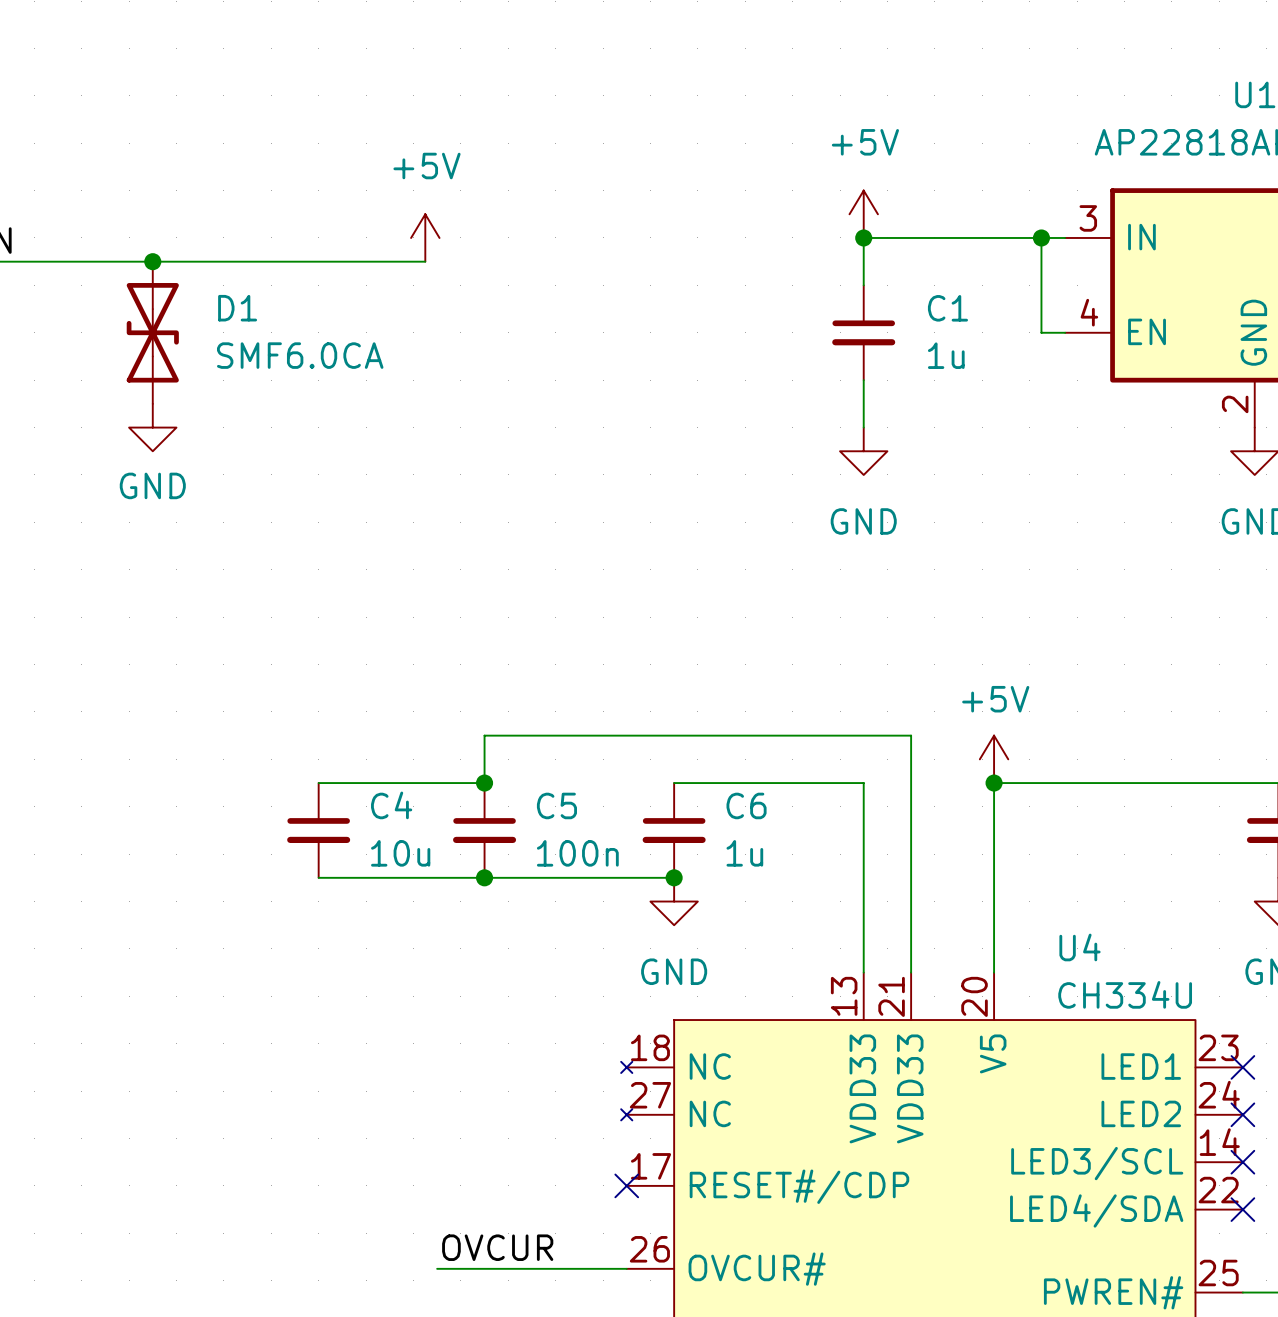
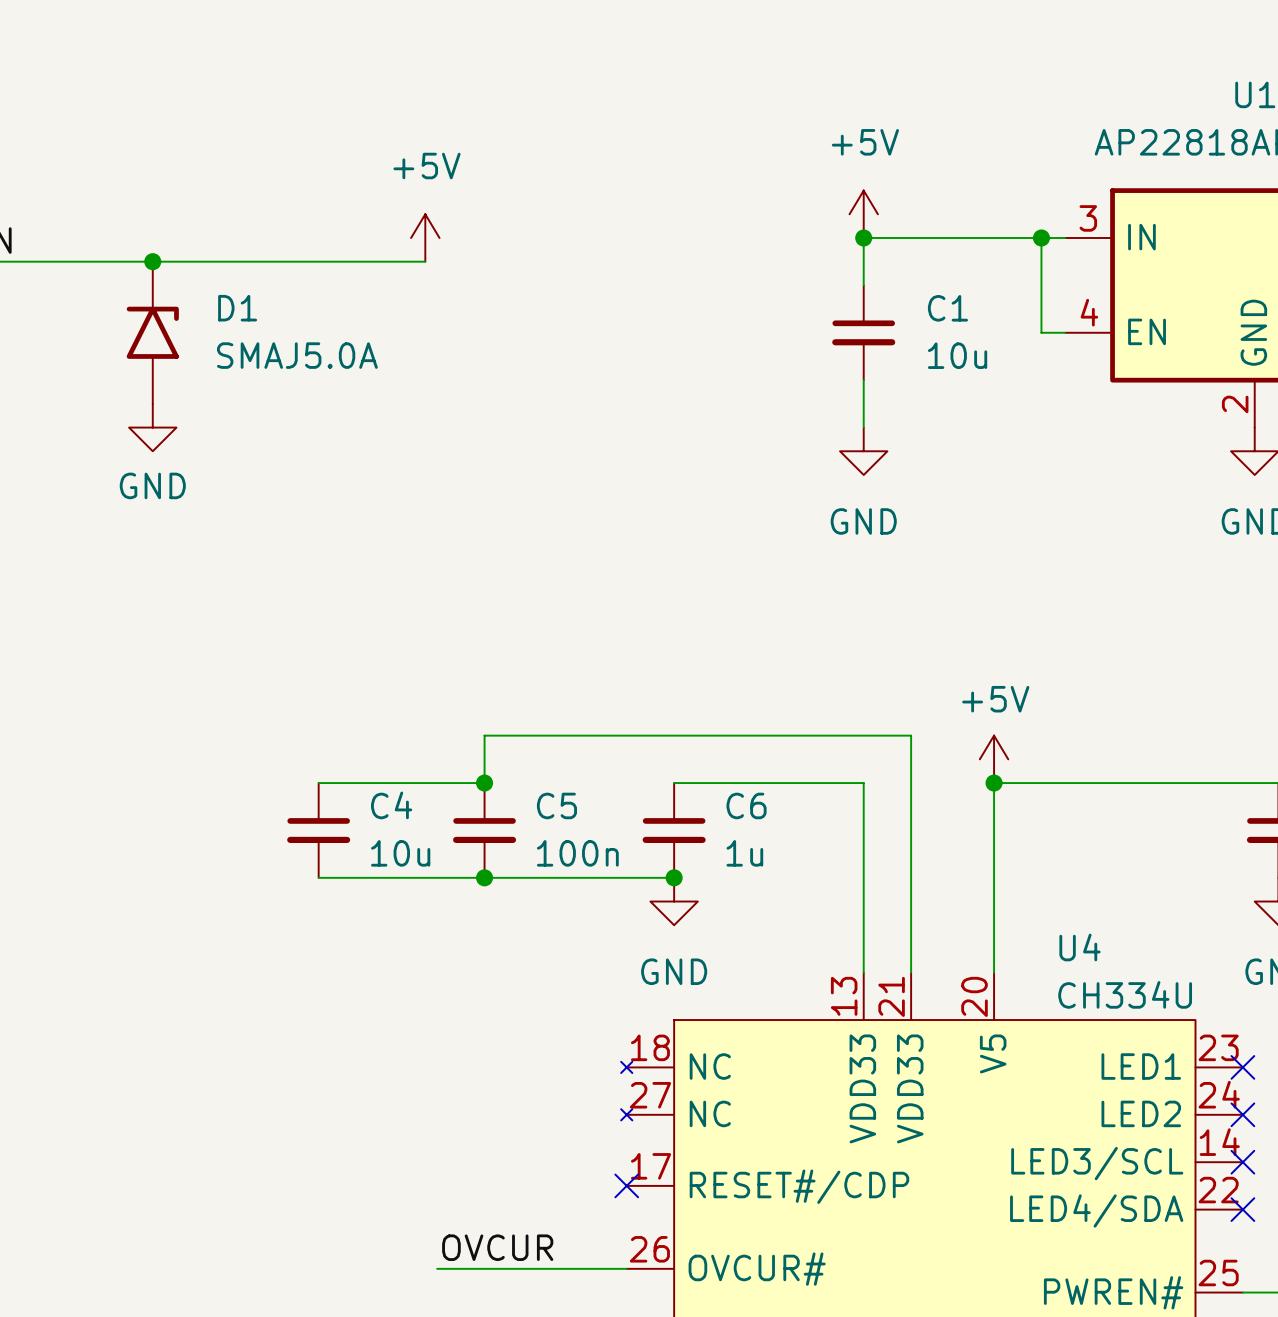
D1 symbol: [126, 261, 179, 404] -> [126, 261, 179, 404]
D1 value: SMF6.0CA (300, 355) -> SMAJ5.0A (297, 355)
C1 value: 1u (946, 355) -> 10u (957, 355)

